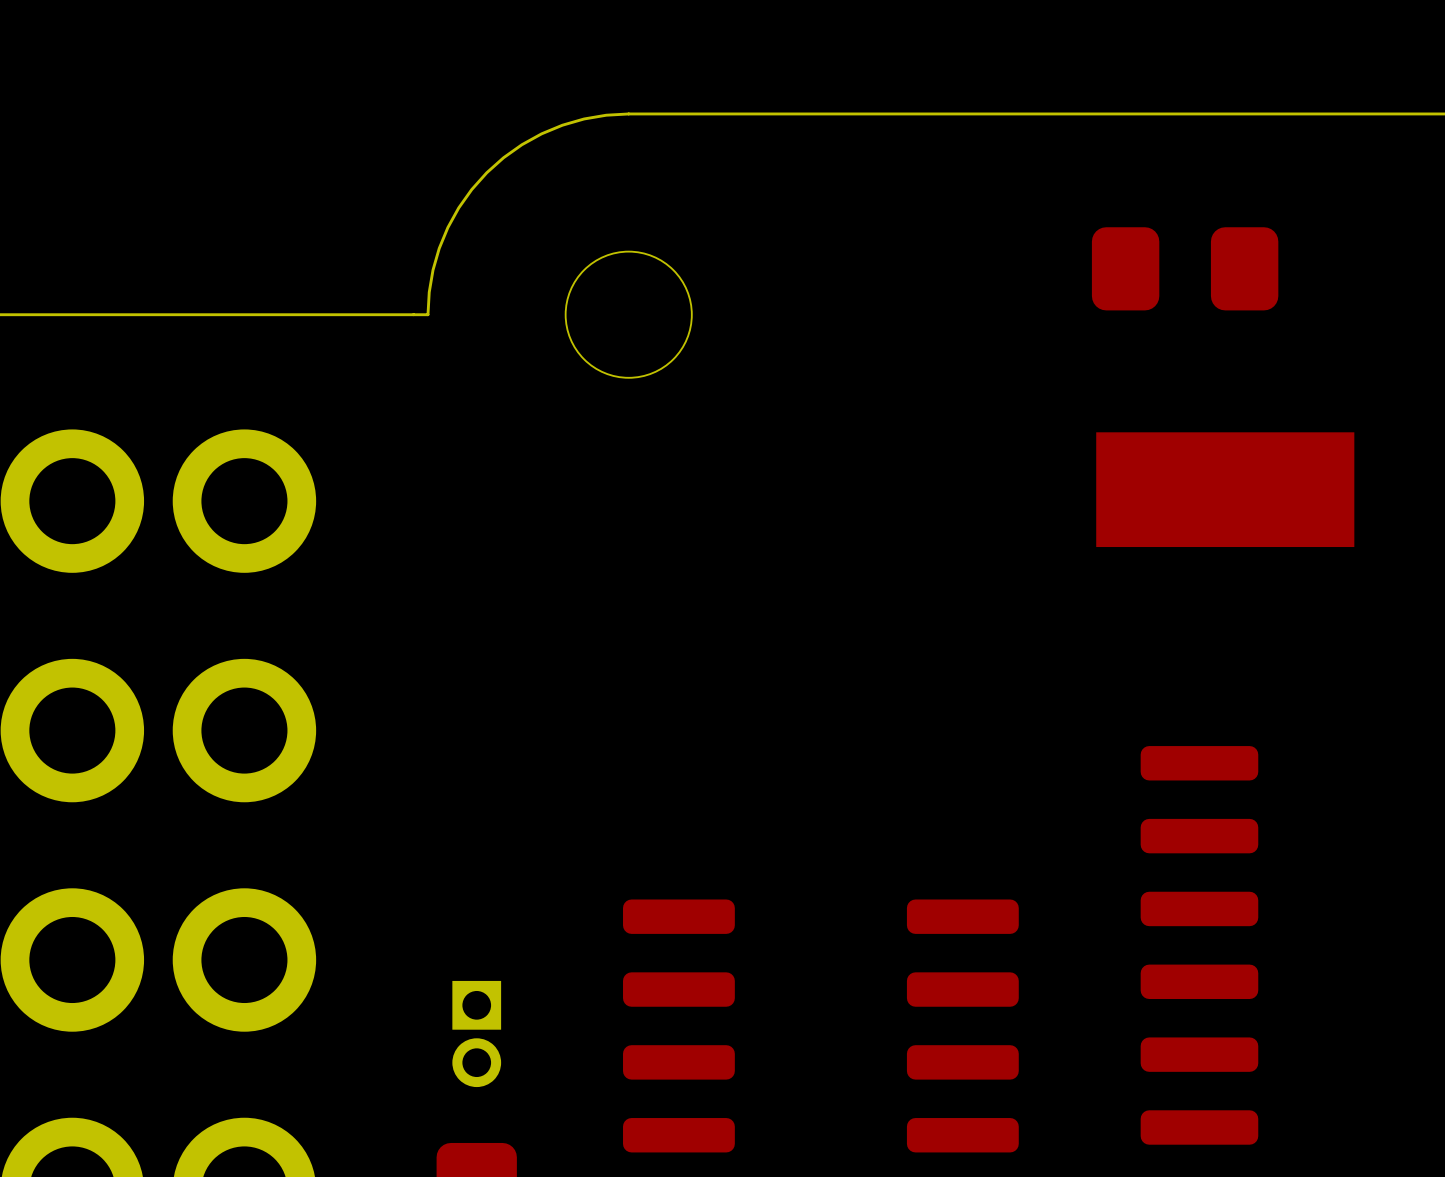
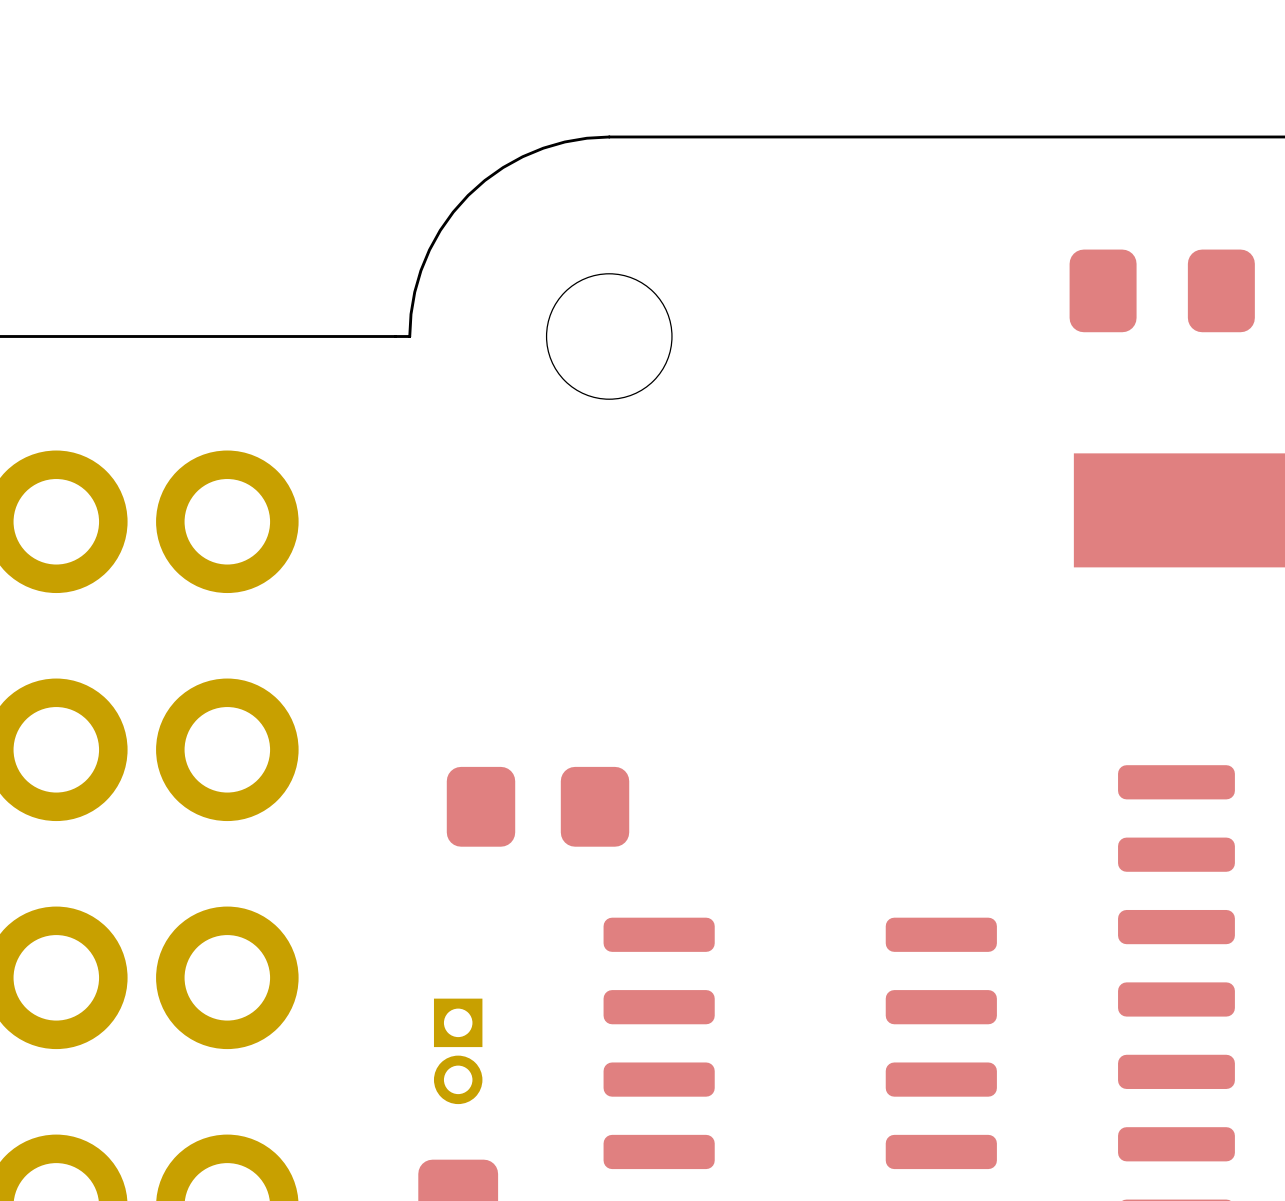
part: none -> (538, 806)

